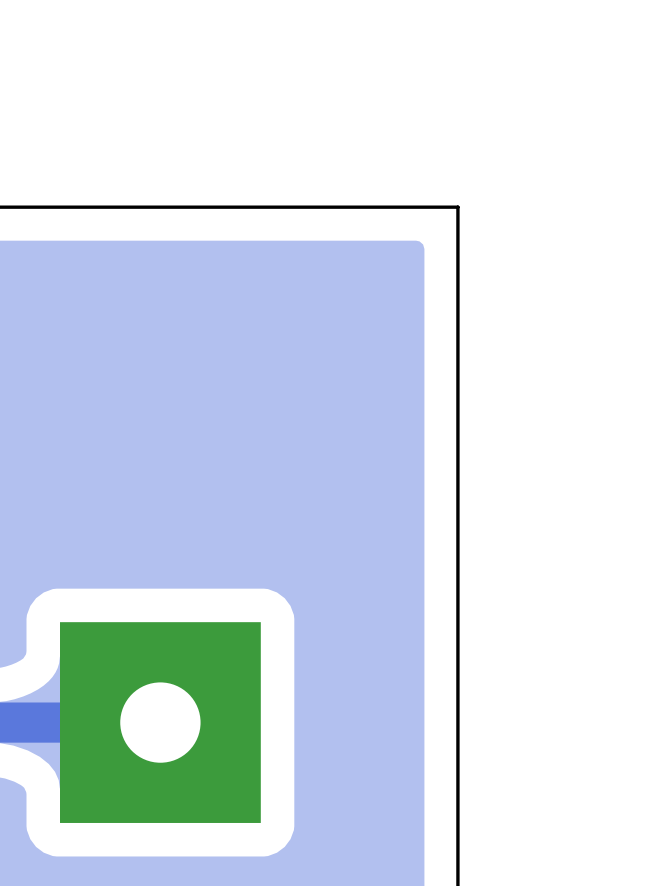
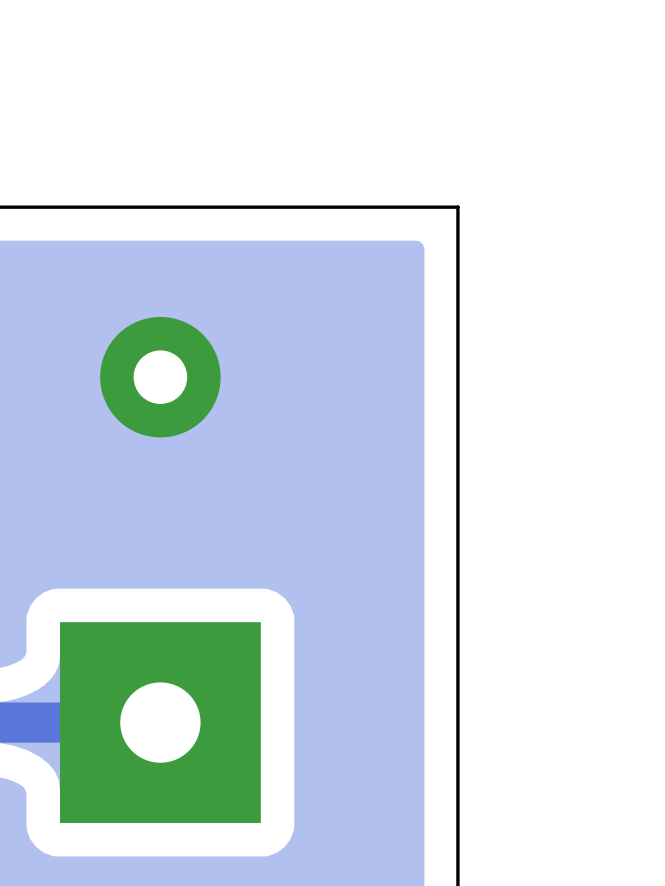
via: none -> (160, 377)

